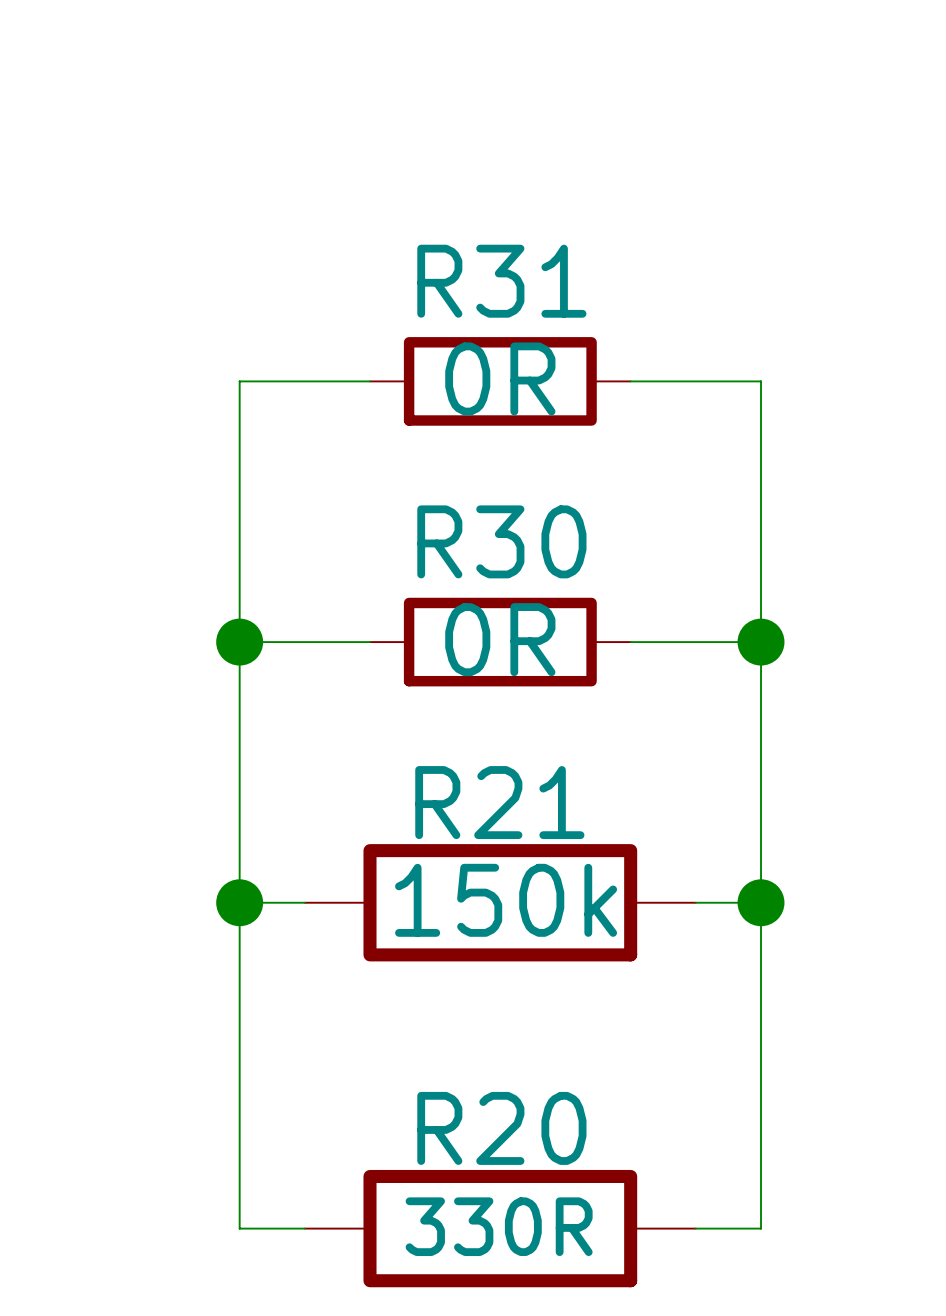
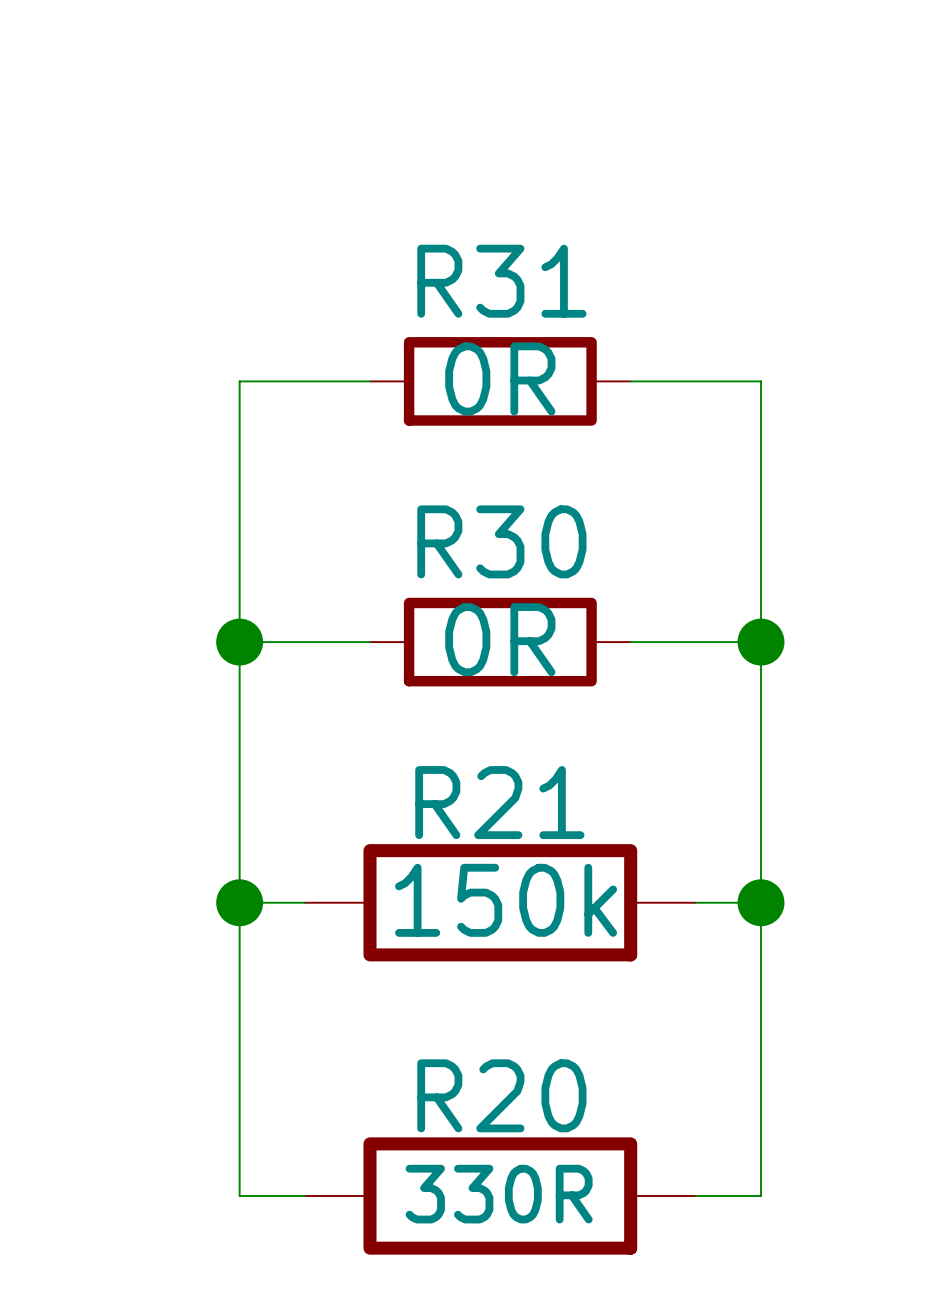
wire: (239, 1196) (239, 1228) (304, 1228) -> (239, 1196) (304, 1196)
wire: (761, 1196) (761, 1228) (695, 1228) -> (761, 1196) (695, 1196)
R20 position: (500, 1228) -> (500, 1196)

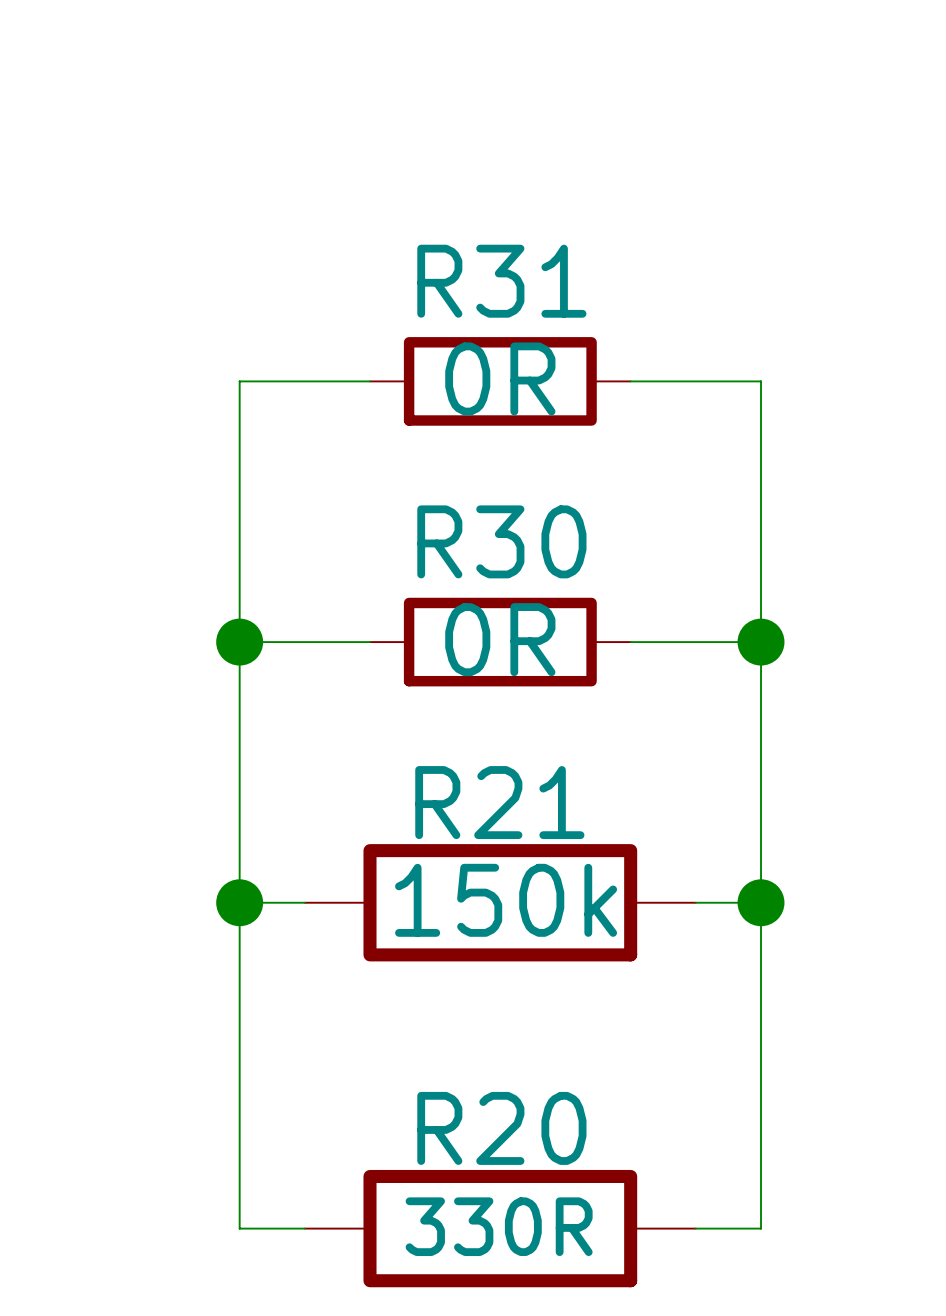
wire: (239, 1196) (304, 1196) -> (239, 1196) (239, 1228) (304, 1228)
R20 position: (500, 1196) -> (500, 1228)
wire: (695, 1196) (761, 1196) -> (695, 1228) (761, 1228) (761, 1196)

